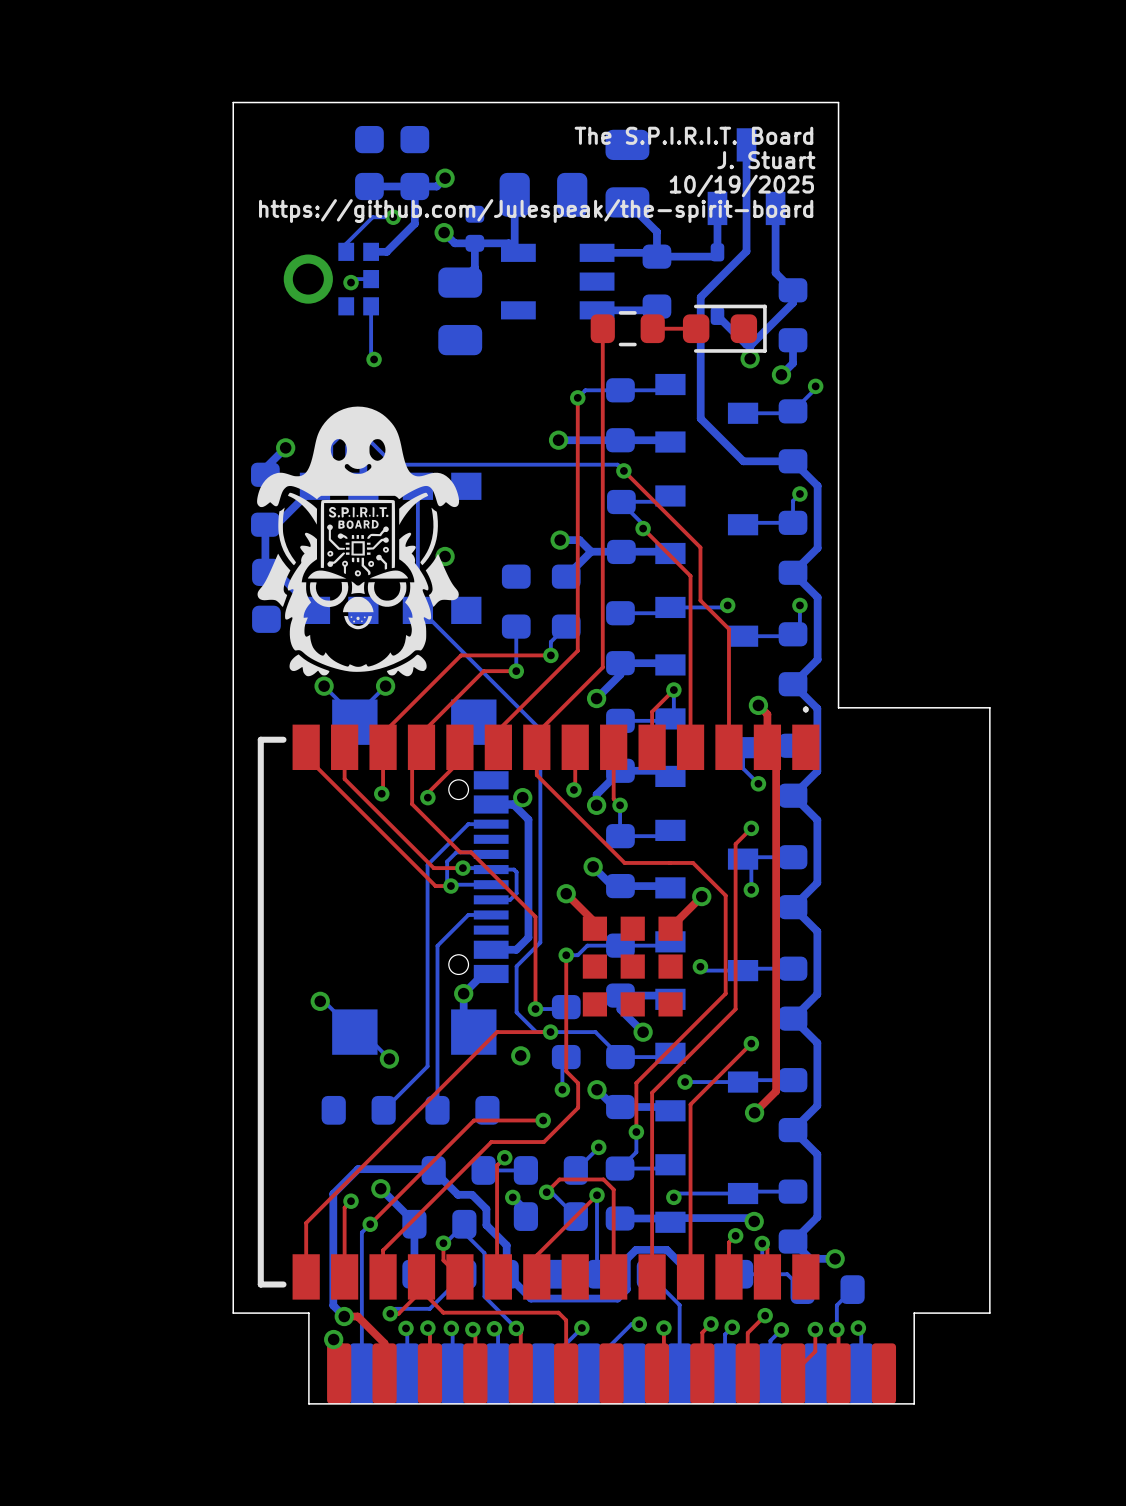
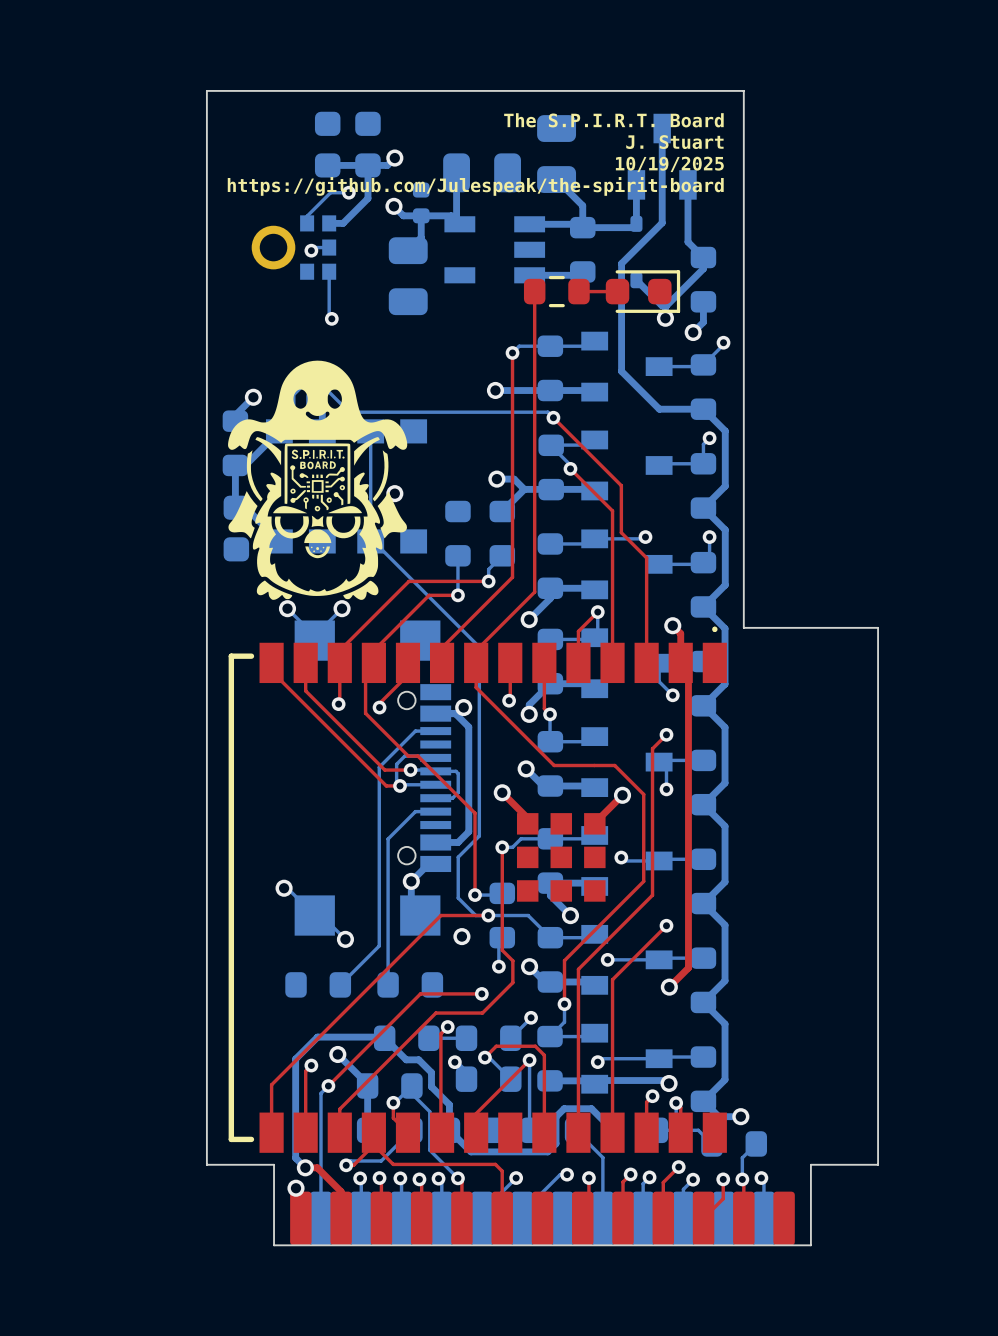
text: The S.P.I.R.I.T. Board (693, 135) -> The S.P.I.R.T. Board (613, 120)

